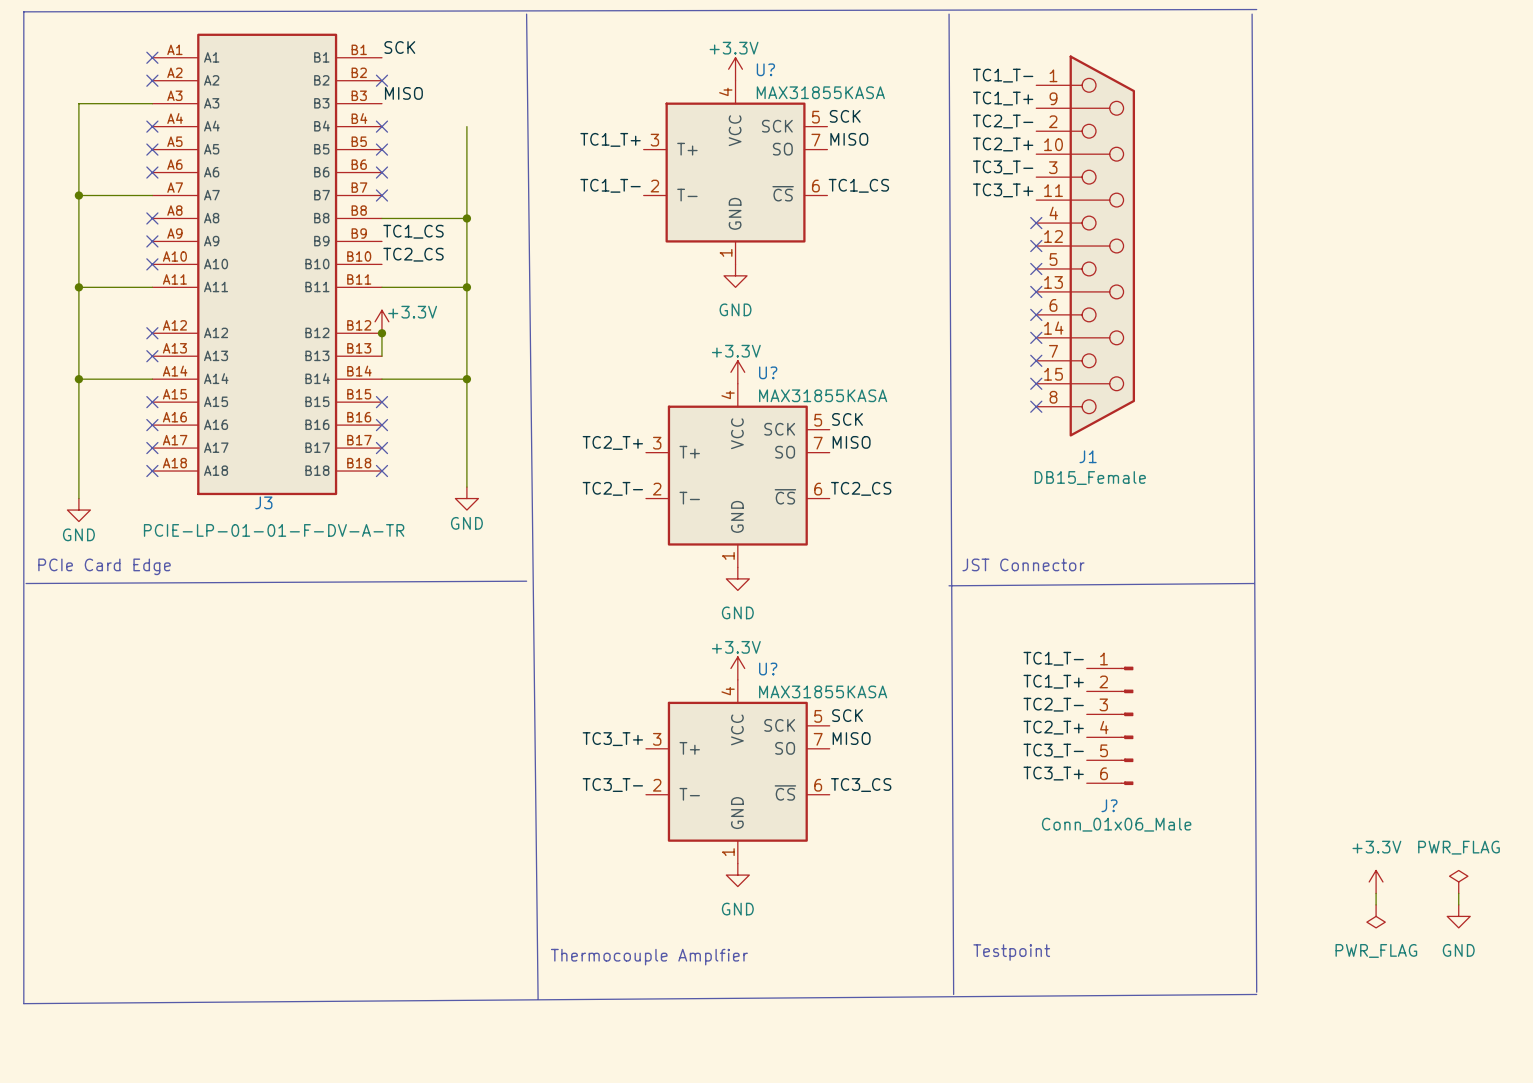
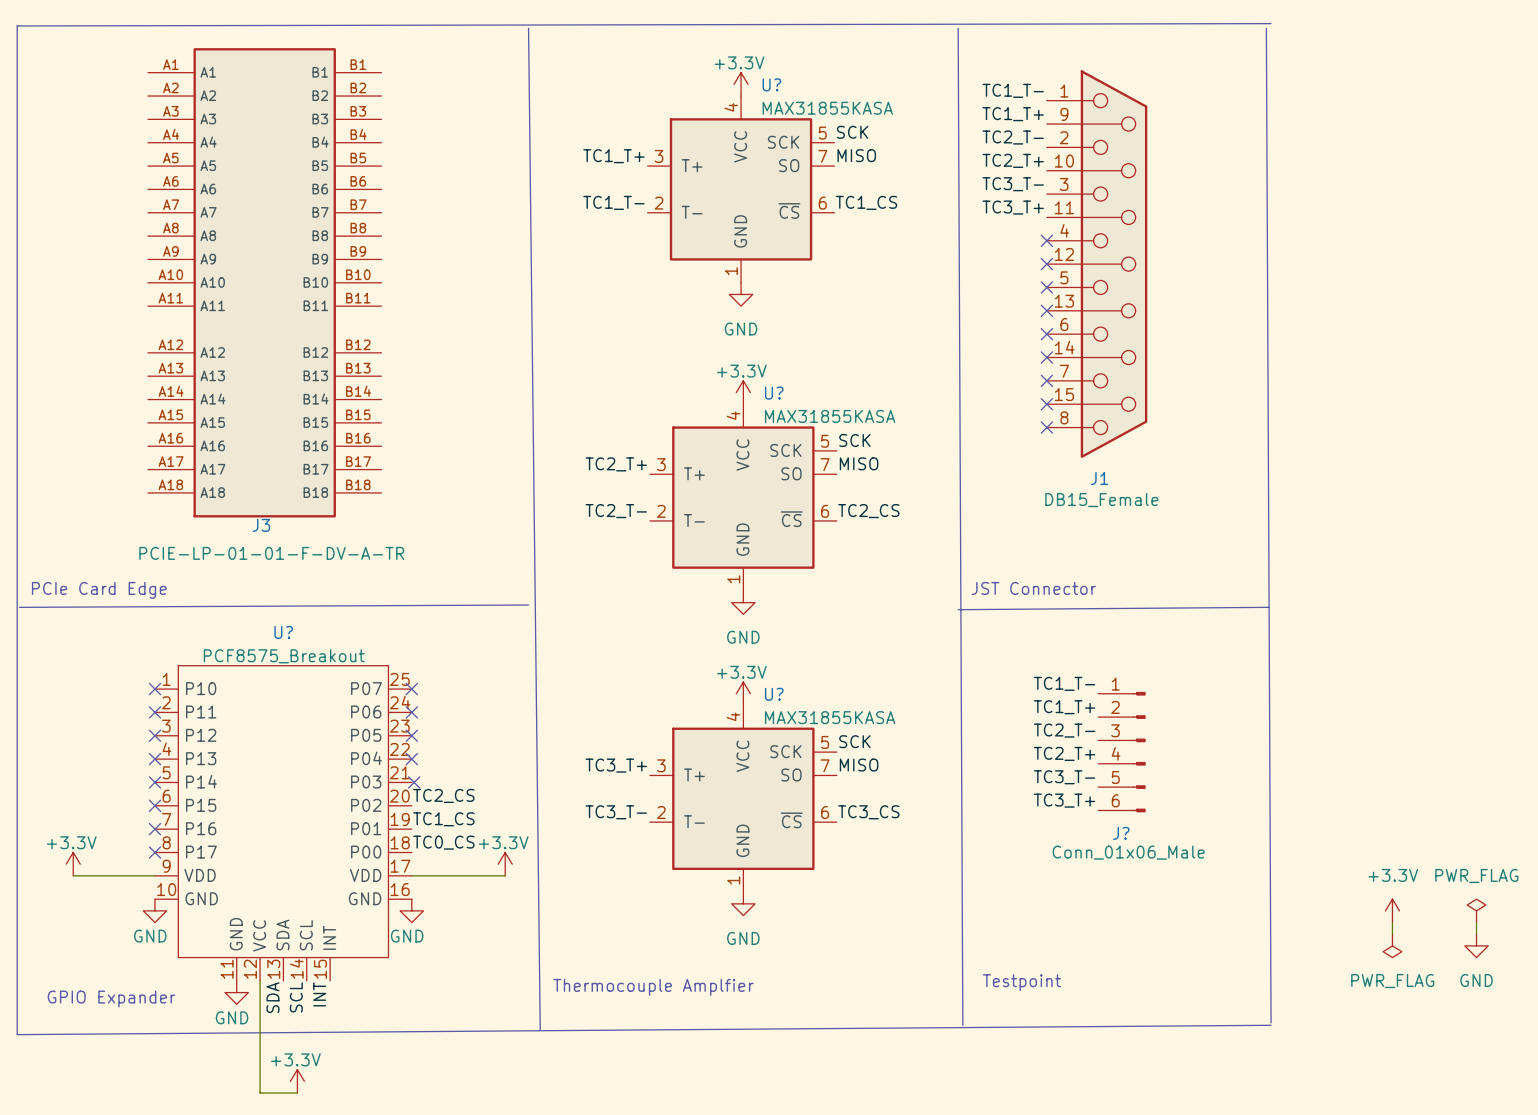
label: SCK (399, 47) -> none
no-connect mark: (152, 57) -> none
no-connect mark: (152, 80) -> none
no-connect mark: (381, 80) -> none
label: MISO (403, 93) -> none
wire: (152, 103) (78, 103) (78, 498) -> none
no-connect mark: (152, 126) -> none
no-connect mark: (381, 126) -> none
wire: (466, 126) (466, 487) -> none
no-connect mark: (152, 149) -> none
no-connect mark: (381, 149) -> none
no-connect mark: (152, 172) -> none
no-connect mark: (381, 172) -> none
wire: (78, 195) (152, 195) -> none
junction: (78, 195) -> none
no-connect mark: (381, 195) -> none
no-connect mark: (152, 218) -> none
wire: (381, 218) (466, 218) -> none
junction: (466, 218) -> none
label: TC1_CS (413, 231) -> none
no-connect mark: (152, 241) -> none
label: TC2_CS (413, 254) -> none
no-connect mark: (152, 264) -> none
wire: (78, 287) (152, 287) -> none
junction: (78, 287) -> none
wire: (381, 287) (466, 287) -> none
junction: (466, 287) -> none
power symbol: +3.3V (381, 321) -> none
no-connect mark: (152, 333) -> none
wire: (381, 333) (381, 356) -> none
junction: (381, 333) -> none
no-connect mark: (152, 356) -> none
wire: (78, 379) (152, 379) -> none
junction: (78, 379) -> none
wire: (381, 379) (466, 379) -> none
junction: (466, 379) -> none
no-connect mark: (152, 402) -> none
no-connect mark: (381, 402) -> none
no-connect mark: (152, 425) -> none
no-connect mark: (381, 425) -> none
no-connect mark: (152, 448) -> none
no-connect mark: (381, 448) -> none
no-connect mark: (152, 471) -> none
no-connect mark: (381, 471) -> none
power symbol: GND (466, 498) -> none
power symbol: GND (78, 510) -> none
no-connect mark: none -> (154, 689)
no-connect mark: none -> (411, 689)
no-connect mark: none -> (154, 712)
no-connect mark: none -> (411, 712)
no-connect mark: none -> (154, 735)
no-connect mark: none -> (411, 735)
no-connect mark: none -> (154, 759)
no-connect mark: none -> (411, 759)
no-connect mark: none -> (154, 782)
no-connect mark: none -> (414, 782)
label: none -> TC2_CS (443, 795)
no-connect mark: none -> (154, 805)
label: none -> TC1_CS (443, 819)
U?: none -> PCF8575_Breakout (283, 823)
no-connect mark: none -> (154, 829)
label: none -> TC0_CS (443, 842)
no-connect mark: none -> (154, 852)
power symbol: none -> +3.3V (73, 864)
power symbol: none -> +3.3V (505, 864)
wire: none -> (73, 875) (154, 875)
wire: none -> (411, 875) (505, 875)
power symbol: none -> GND (154, 910)
power symbol: none -> GND (411, 910)
wire: none -> (260, 980) (260, 1093) (297, 1093)
power symbol: none -> GND (236, 992)
label: none -> INT (319, 994)
label: none -> SDA (272, 997)
label: none -> SCL (296, 997)
text: none -> GPIO Expander (111, 998)
power symbol: none -> +3.3V (297, 1081)

